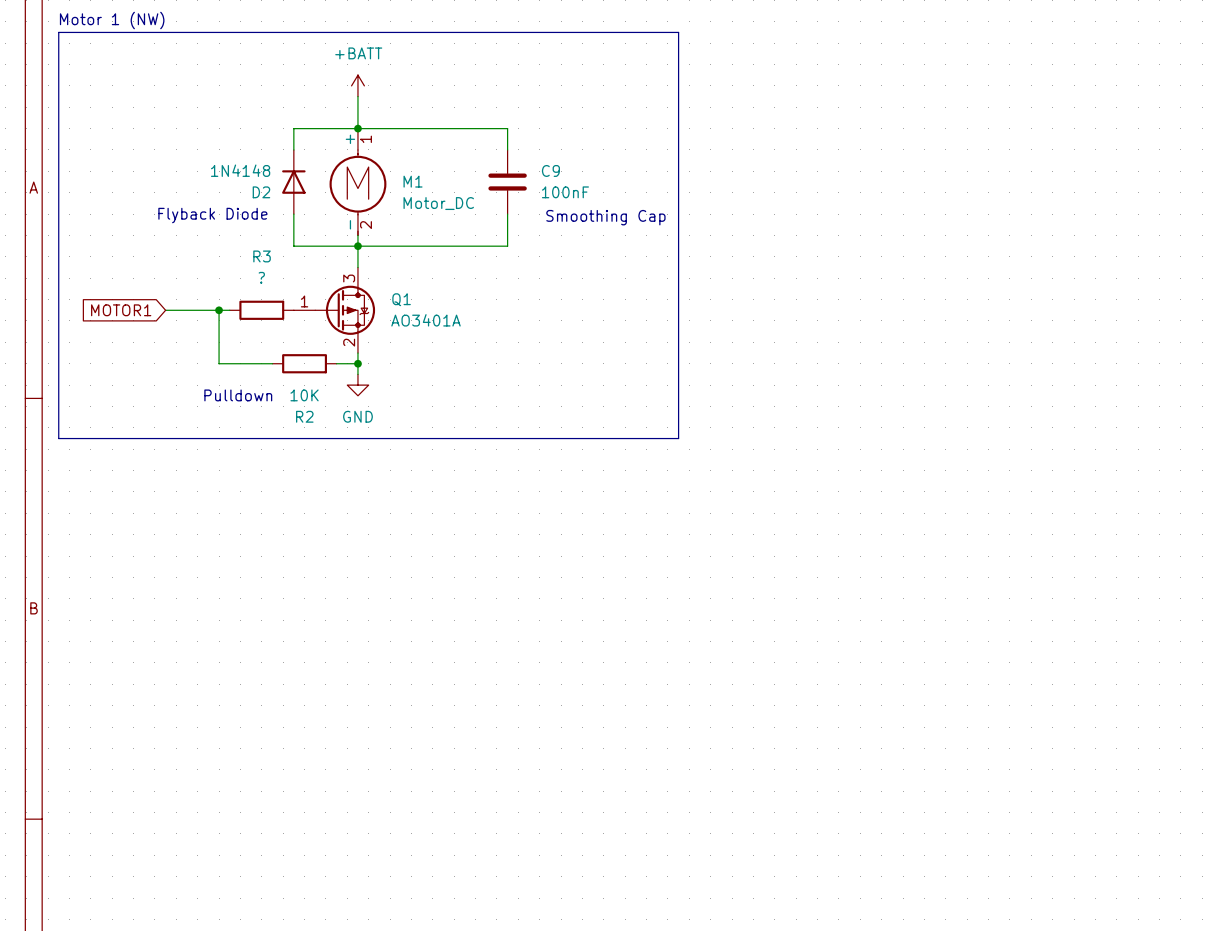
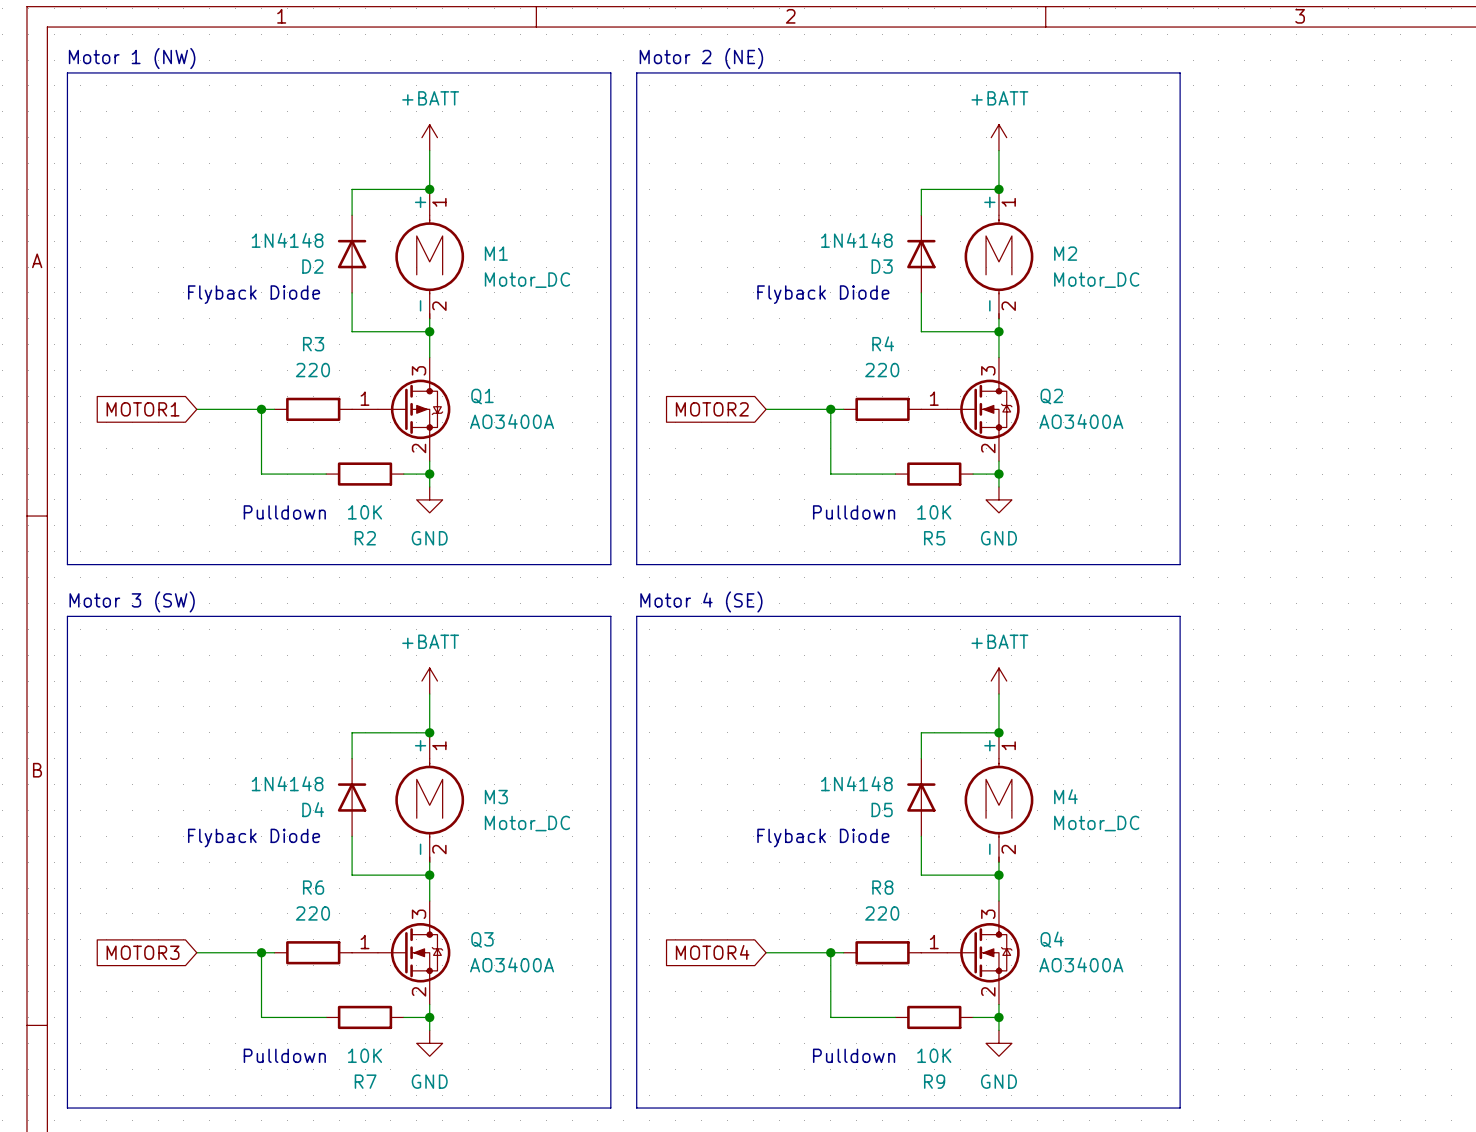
text: none -> Motor 2 (NE) (701, 58)
line: (507, 32) (528, 32) -> (610, 72) (610, 564)
line: (678, 32) (678, 438) -> (817, 72) (1180, 72) (1180, 564) (817, 564)
power symbol: none -> +BATT (998, 137)
wire: none -> (998, 150) (998, 189) (921, 189) (921, 215)
wire: (357, 128) (507, 128) (507, 149) -> none
junction: none -> (998, 189)
C9: 100nF (507, 182) -> none
D3: none -> 1N4148 (921, 254)
M2: none -> Motor_DC (998, 254)
wire: (507, 214) (507, 246) (357, 246) -> none
wire: none -> (921, 292) (921, 331) (998, 331)
text: none -> Flyback Diode (823, 294)
text: Smoothing Cap (605, 217) -> none
wire: none -> (998, 318) (998, 357)
junction: none -> (998, 331)
R3 value: ? (261, 277) -> 220 (312, 370)
global label: none -> MOTOR2 (712, 409)
wire: none -> (766, 409) (843, 409)
wire: none -> (830, 409) (830, 474) (895, 474)
junction: none -> (830, 409)
R4: none -> 220 (882, 409)
Q2: none -> AO3400A (970, 409)
Q1 value: AO3401A (426, 320) -> AO3400A (512, 421)
wire: none -> (998, 461) (998, 486)
R5: none -> 10K (934, 474)
wire: none -> (973, 474) (998, 474)
junction: none -> (998, 474)
power symbol: none -> GND (998, 499)
text: none -> Pulldown (854, 512)
line: (507, 438) (528, 438) -> (636, 72) (636, 564)
text: none -> Motor 3 (SW) (132, 601)
text: none -> Motor 4 (SE) (701, 601)
line: none -> (67, 616) (610, 616) (610, 1108) (67, 1108) (67, 616)
line: none -> (636, 616) (1180, 616) (1180, 1108) (636, 1108) (636, 616)
power symbol: none -> +BATT (429, 681)
power symbol: none -> +BATT (998, 681)
wire: none -> (429, 693) (429, 732) (352, 732) (352, 758)
wire: none -> (998, 693) (998, 732) (921, 732) (921, 758)
junction: none -> (429, 732)
junction: none -> (998, 732)
D4: none -> 1N4148 (352, 797)
M3: none -> Motor_DC (429, 797)
D5: none -> 1N4148 (921, 797)
M4: none -> Motor_DC (998, 797)
wire: none -> (352, 836) (352, 875) (429, 875)
wire: none -> (921, 836) (921, 875) (998, 875)
text: none -> Flyback Diode (254, 838)
text: none -> Flyback Diode (823, 838)
wire: none -> (429, 862) (429, 901)
wire: none -> (998, 862) (998, 901)
junction: none -> (429, 875)
junction: none -> (998, 875)
global label: none -> MOTOR4 (712, 952)
global label: none -> MOTOR3 (143, 952)
wire: none -> (196, 952) (274, 952)
wire: none -> (261, 952) (261, 1017) (326, 1017)
junction: none -> (261, 952)
R6: none -> 220 (313, 952)
Q3: none -> AO3400A (401, 952)
wire: none -> (766, 952) (843, 952)
wire: none -> (830, 952) (830, 1017) (895, 1017)
junction: none -> (830, 952)
R8: none -> 220 (882, 952)
Q4: none -> AO3400A (970, 952)
wire: none -> (429, 1004) (429, 1030)
wire: none -> (998, 1004) (998, 1030)
R7: none -> 10K (365, 1017)
wire: none -> (403, 1017) (429, 1017)
junction: none -> (429, 1017)
R9: none -> 10K (934, 1017)
wire: none -> (973, 1017) (998, 1017)
junction: none -> (998, 1017)
power symbol: none -> GND (429, 1043)
power symbol: none -> GND (998, 1043)
text: none -> Pulldown (284, 1055)
text: none -> Pulldown (854, 1055)

